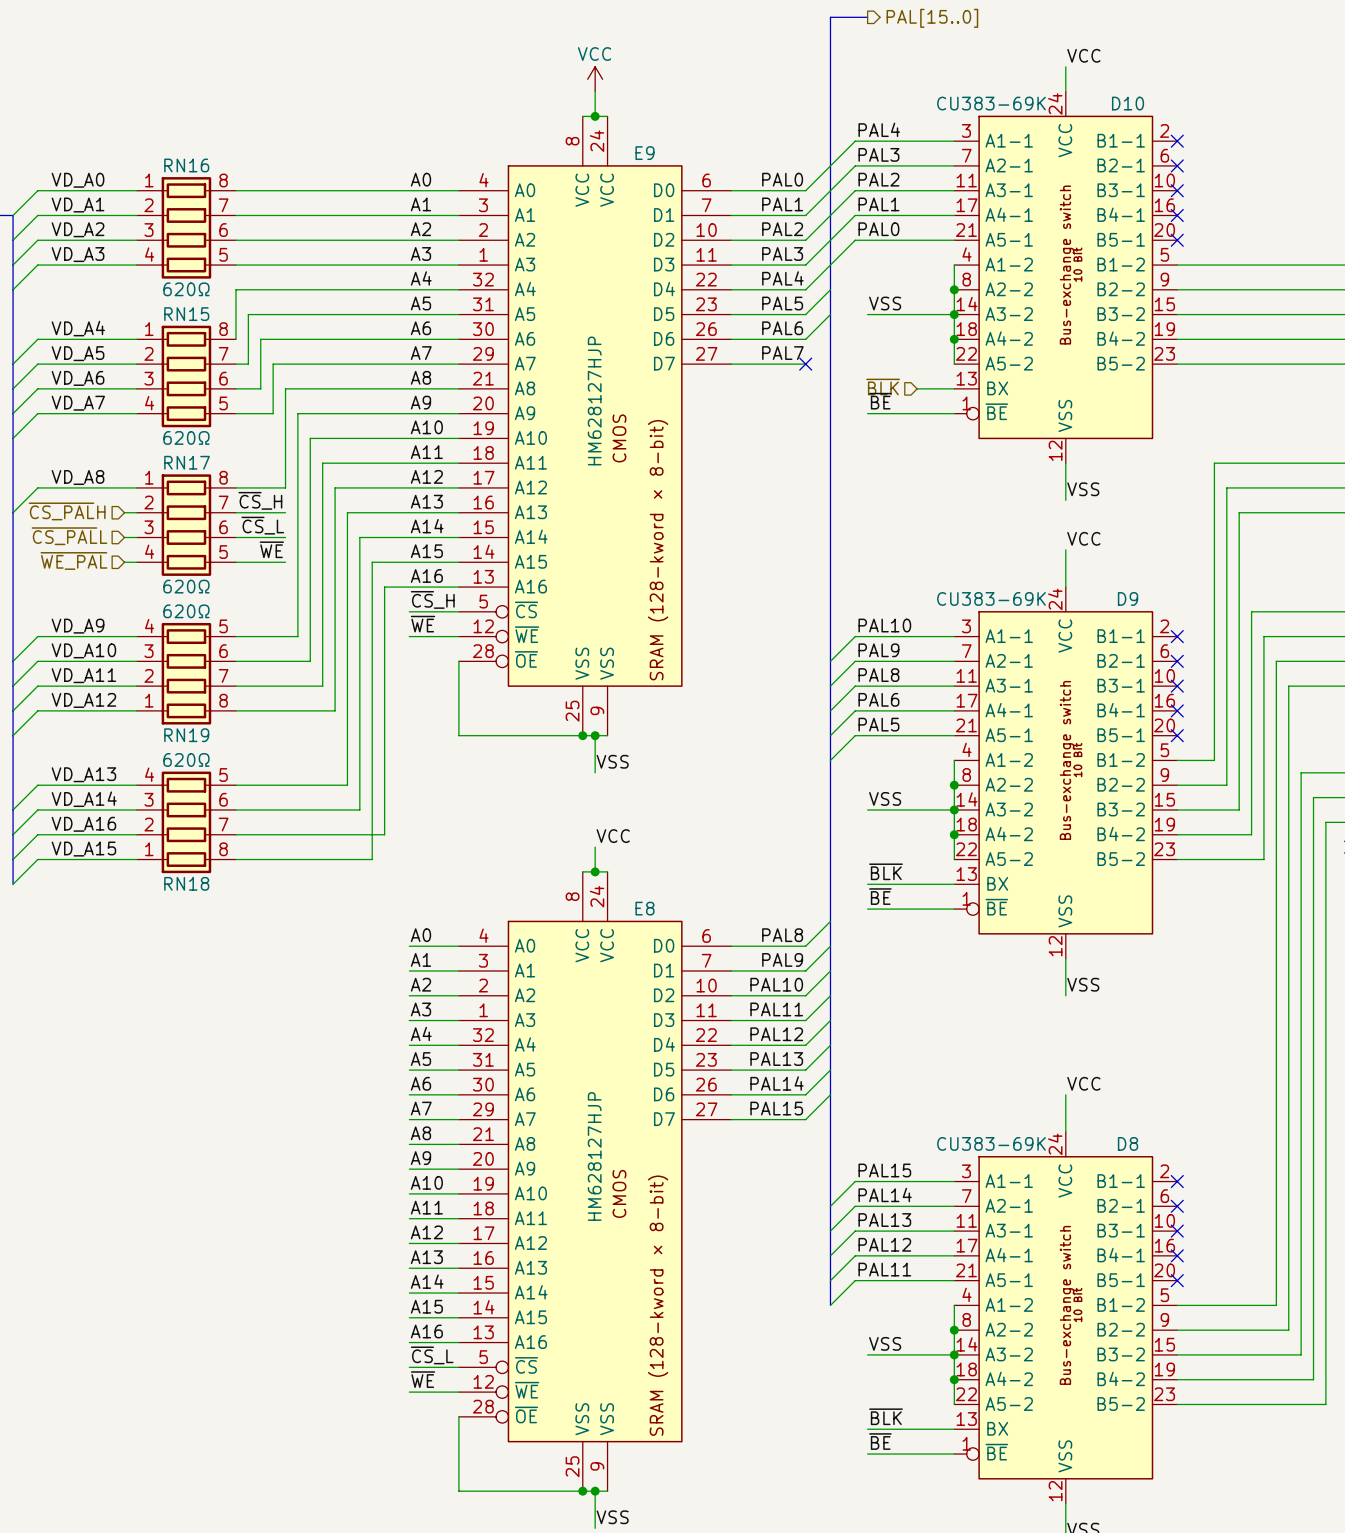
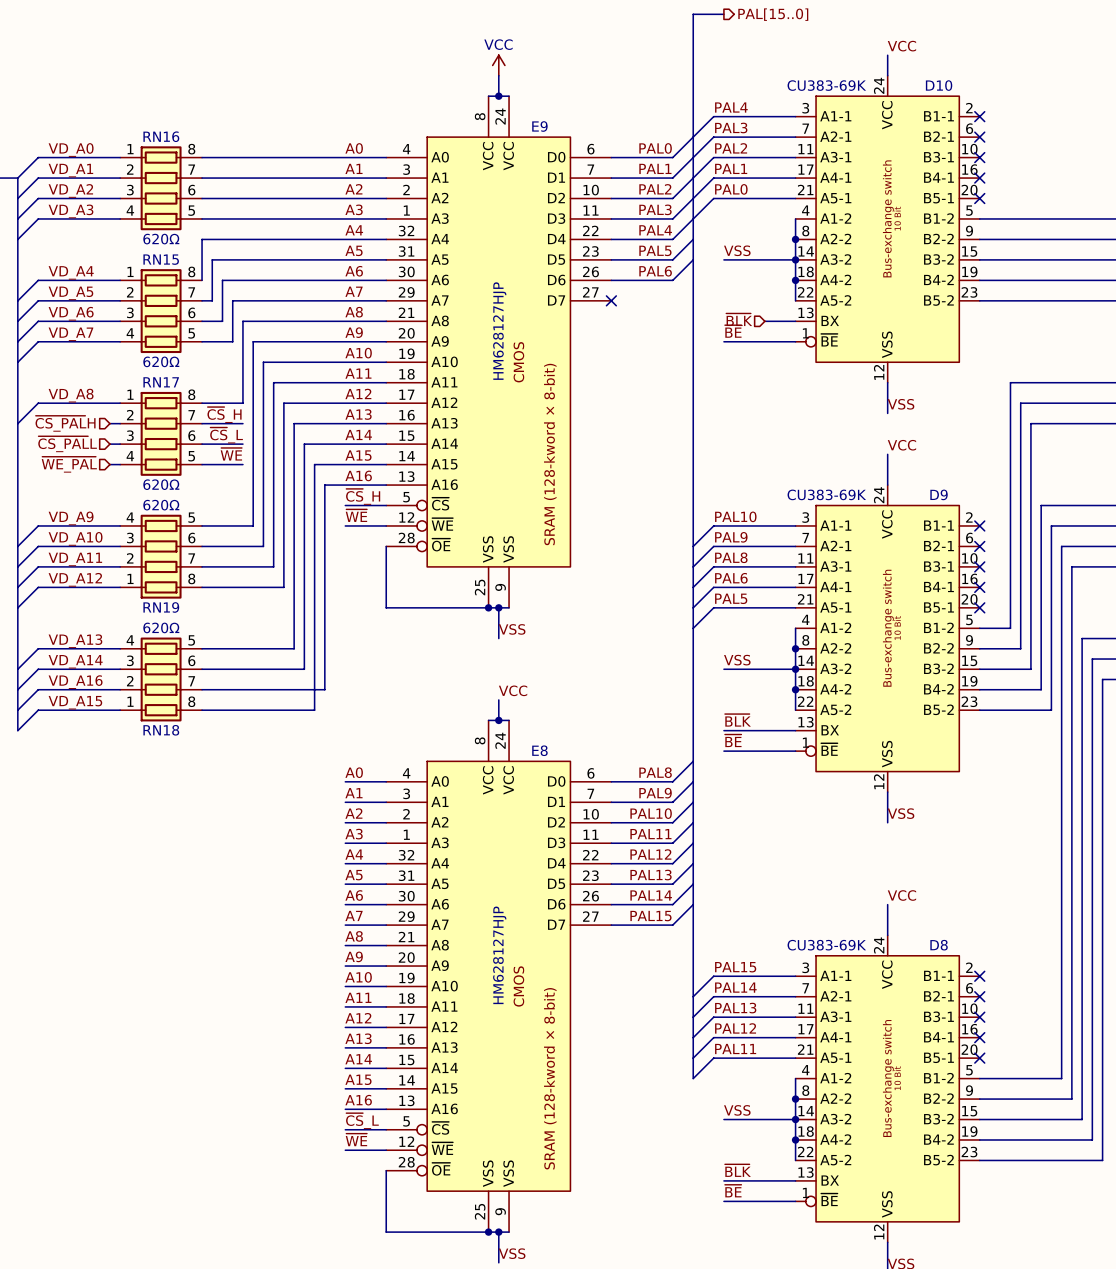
label: PAL7 (782, 353) -> none
wire: (731, 364) (805, 364) -> none
no-connect mark: none -> (611, 300)
no-connect mark: (805, 364) -> none

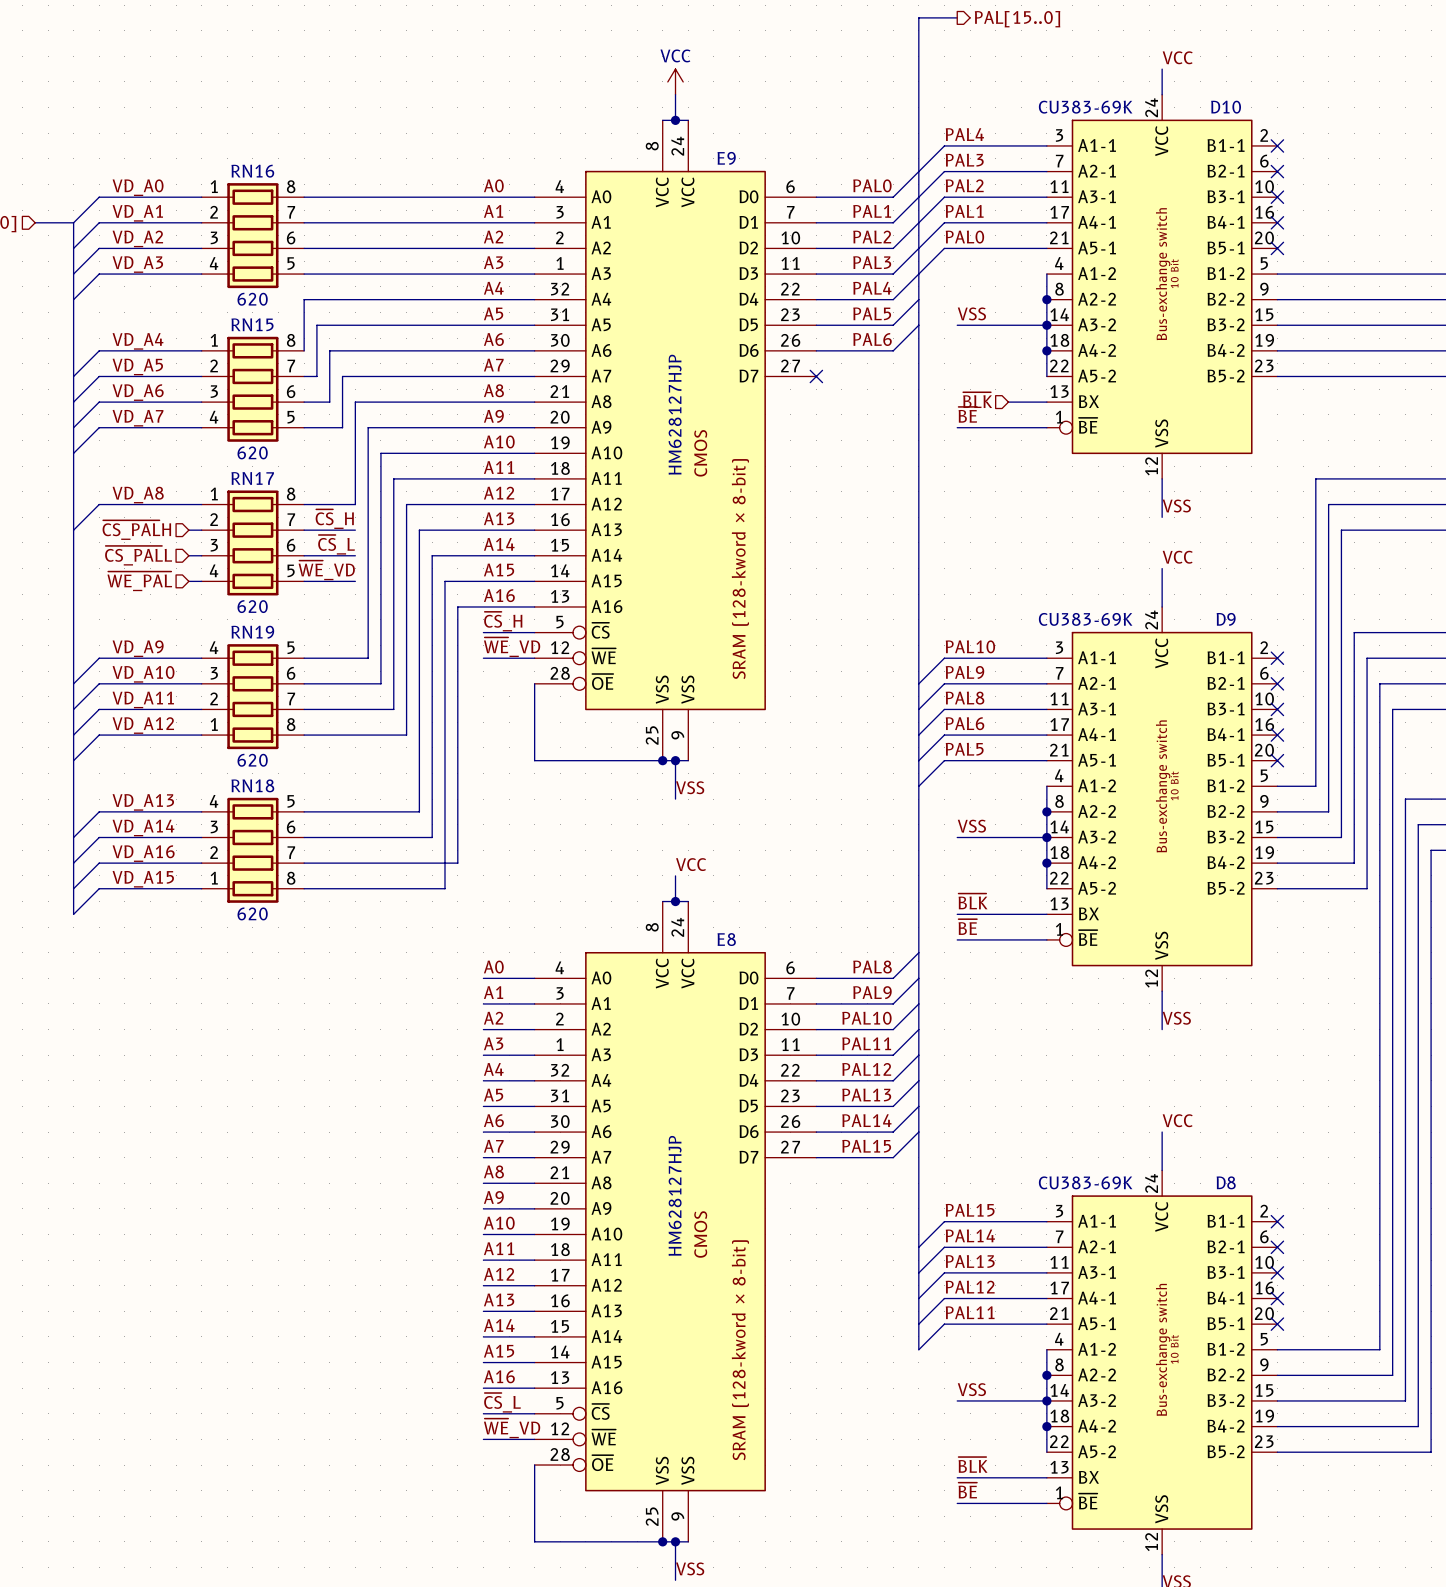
RN16 value: 620Ω (161, 239) -> 620 (252, 299)
RN15 value: 620Ω (161, 361) -> 620 (252, 452)
label: ~{WE} (231, 454) -> ~{WE}_VD (326, 570)
RN17 value: 620Ω (161, 484) -> 620 (252, 606)
RN19 value: 620Ω (161, 505) -> 620 (252, 760)
label: ~{WE} (356, 515) -> ~{WE}_VD (512, 647)
RN19 name position: RN19 (161, 607) -> RN19 (252, 632)
RN18 value: 620Ω (161, 627) -> 620 (252, 913)
RN18 name position: RN18 (161, 730) -> RN18 (252, 785)
label: ~{WE} (356, 1139) -> ~{WE}_VD (512, 1428)

